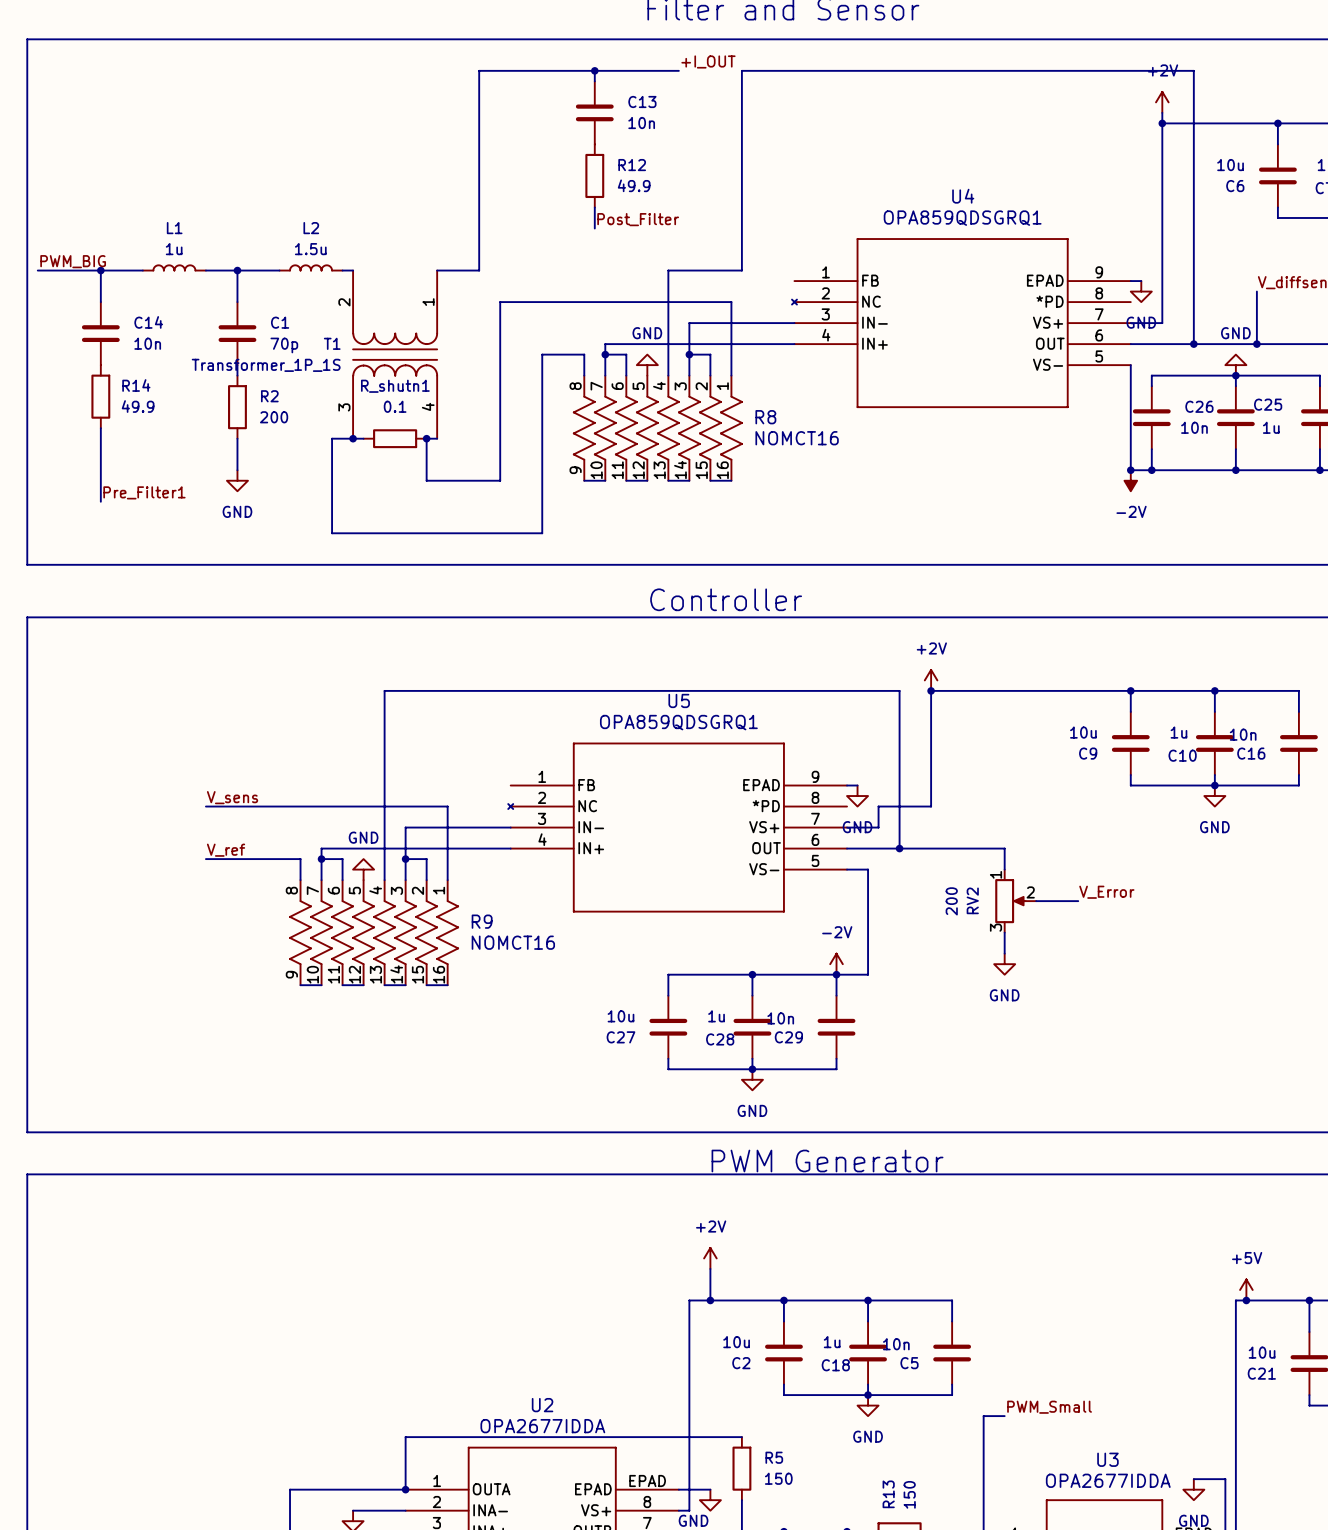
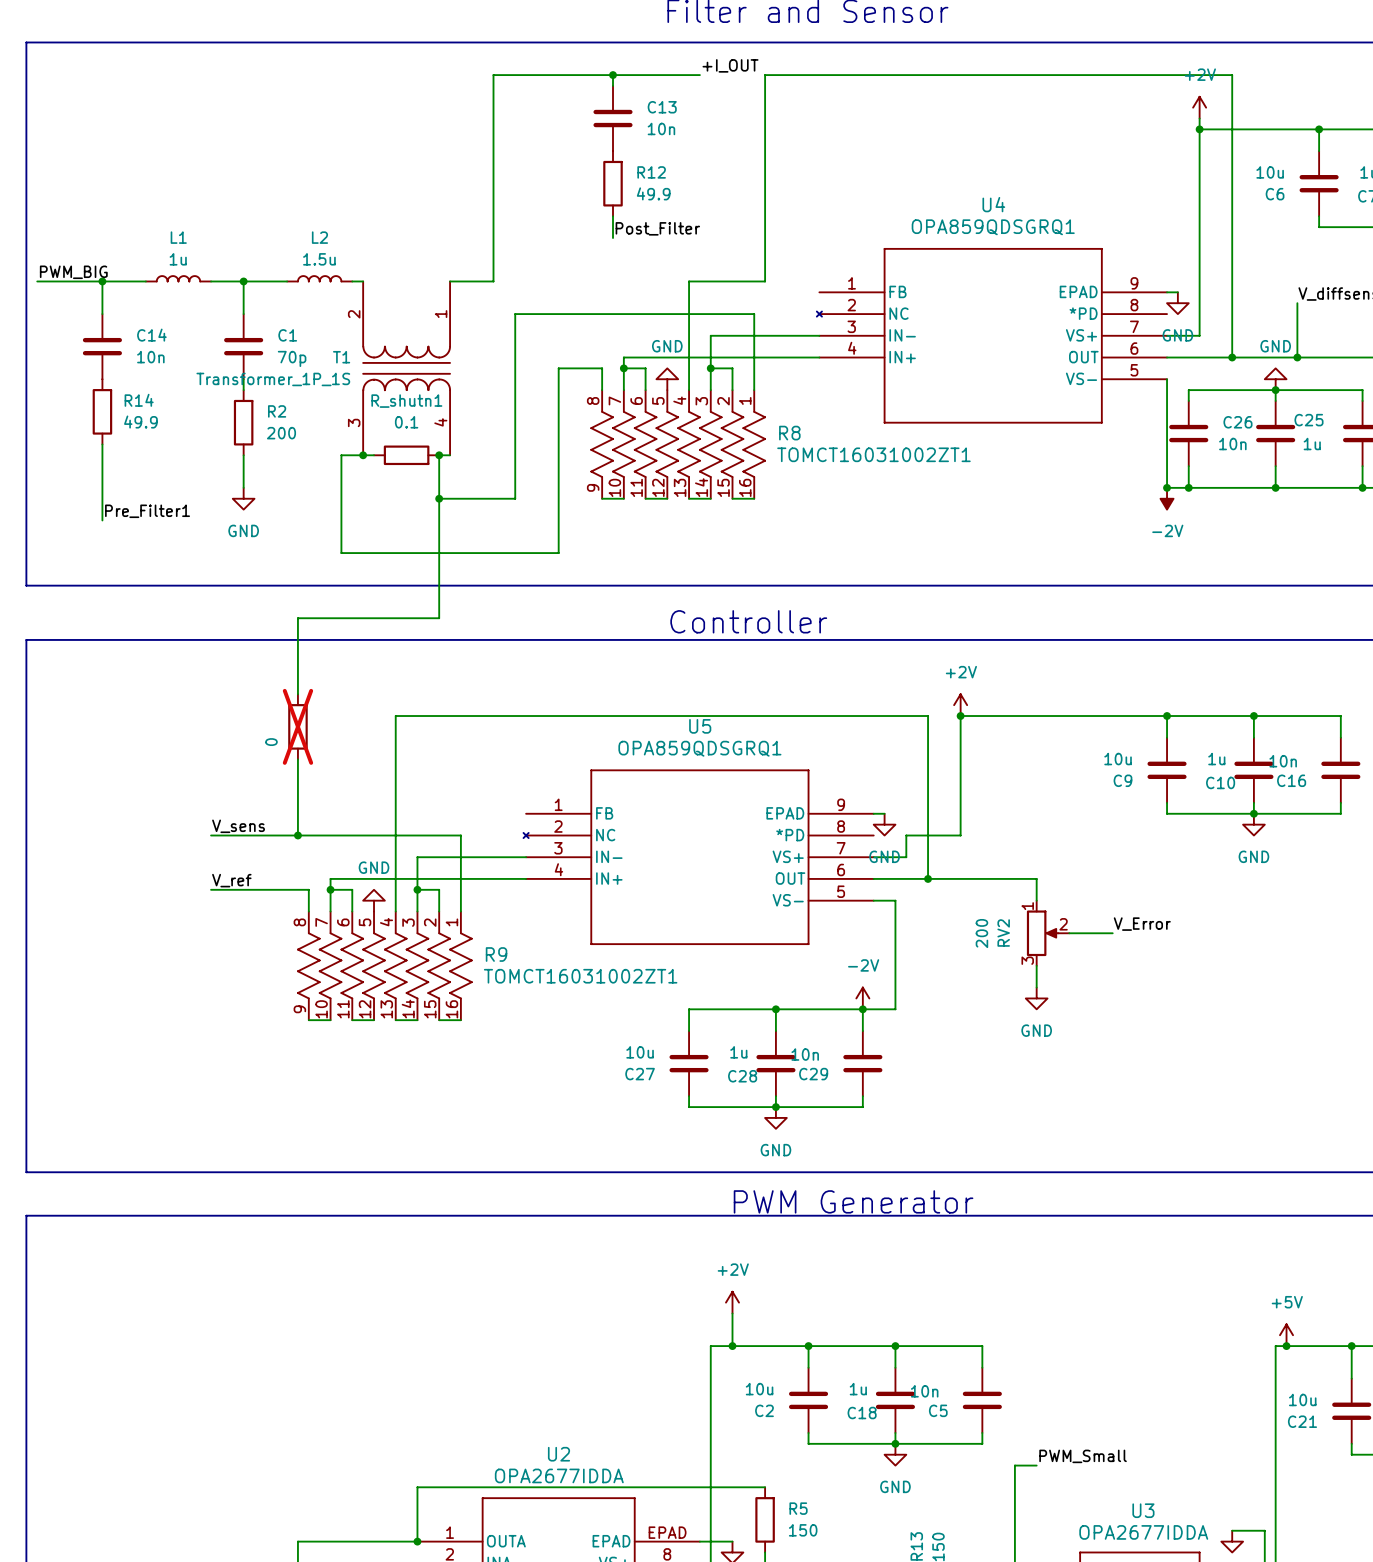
R8 value: NOMCT16 (797, 438) -> TOMCT16031002ZT1 (873, 454)
wire: none -> (439, 498) (439, 618) (297, 618) (297, 694)
junction: none -> (439, 498)
part: none -> 0 (297, 726)
wire: none -> (297, 759) (297, 835)
junction: none -> (297, 835)
R9 value: NOMCT16 (513, 942) -> TOMCT16031002ZT1 (580, 976)

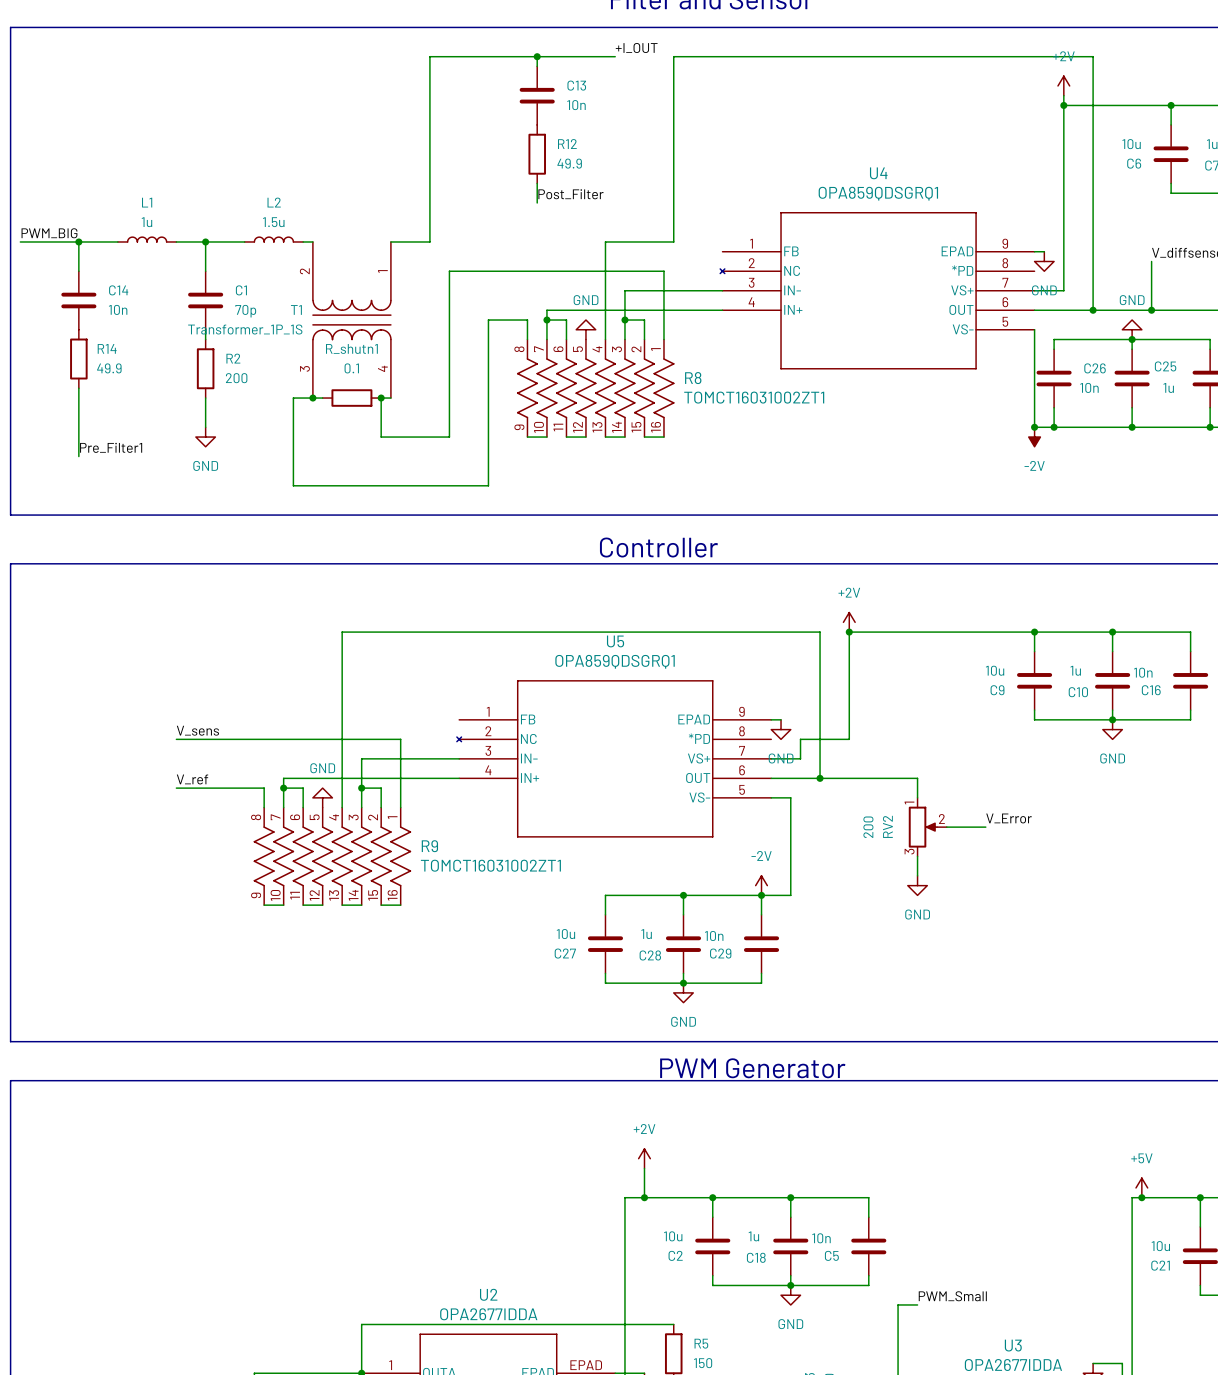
wire: (439, 498) (439, 618) (297, 618) (297, 694) -> none
junction: (439, 498) -> none
part: 0 (297, 726) -> none
wire: (297, 759) (297, 835) -> none
junction: (297, 835) -> none

